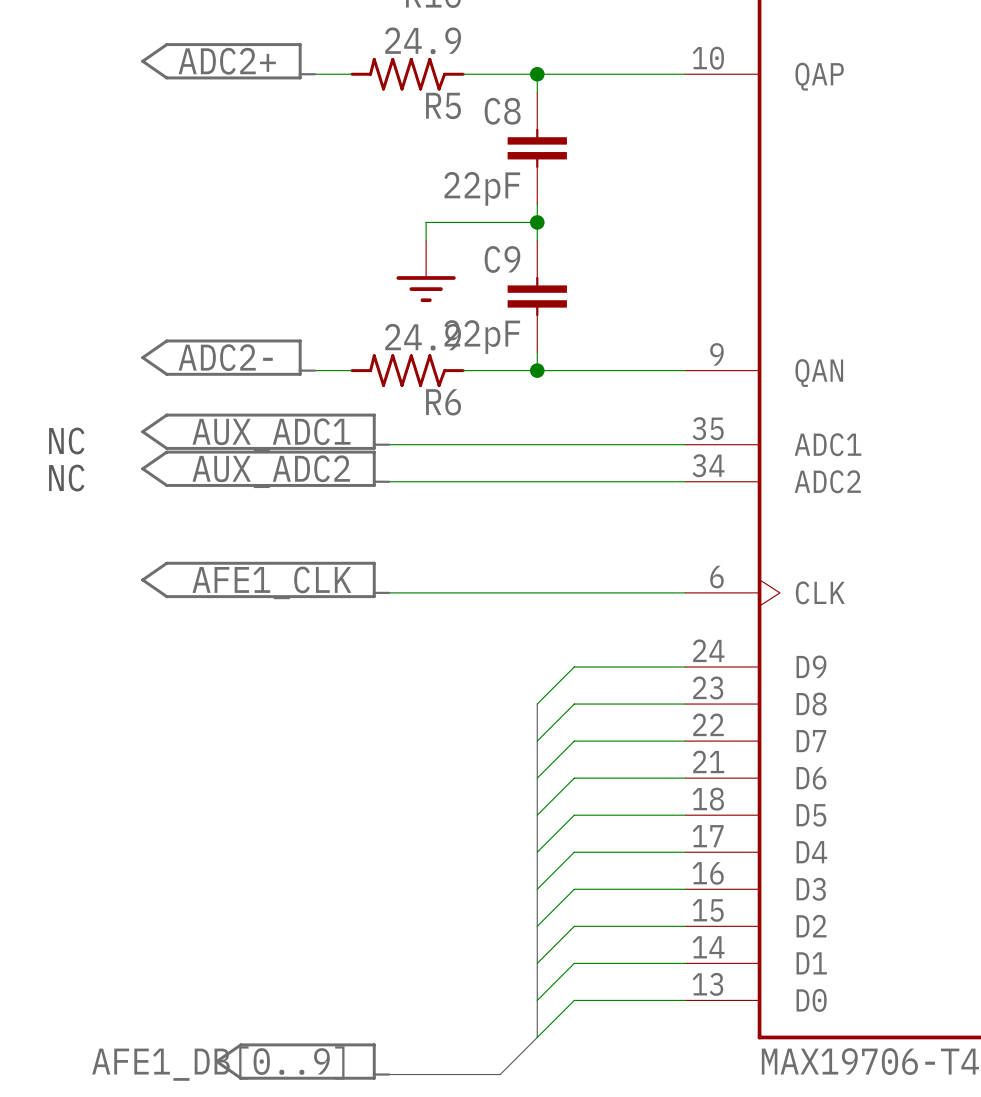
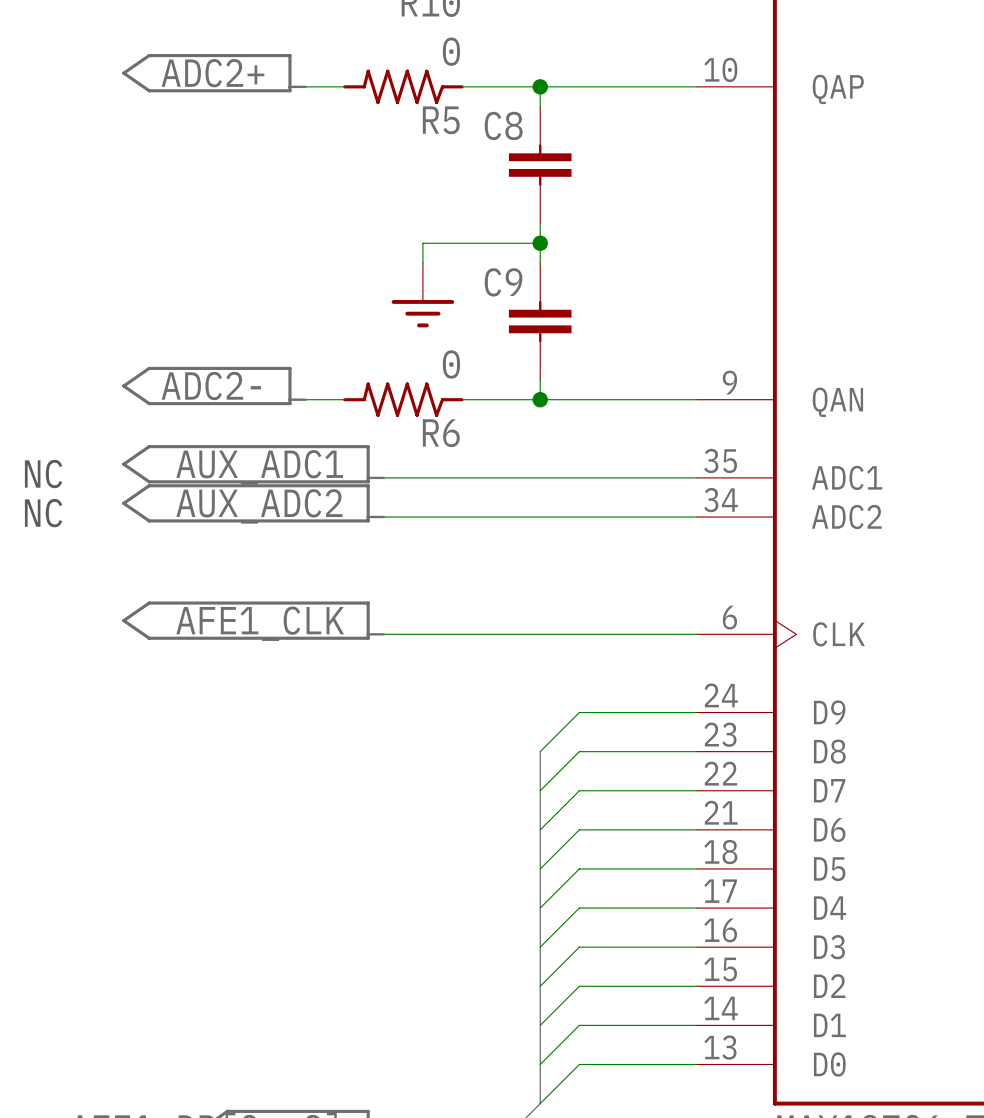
R5 value: 24.9 (423, 40) -> 0 (451, 51)
C8 value: 22pF (482, 188) -> none
R6 value: 24.9 (423, 337) -> 0 (451, 364)
C9 value: 22pF (482, 337) -> none

